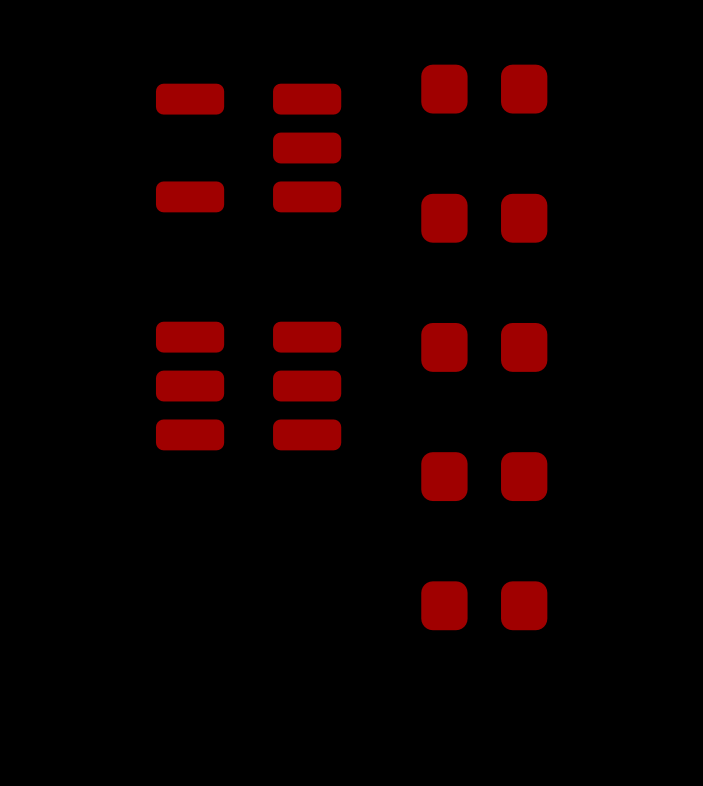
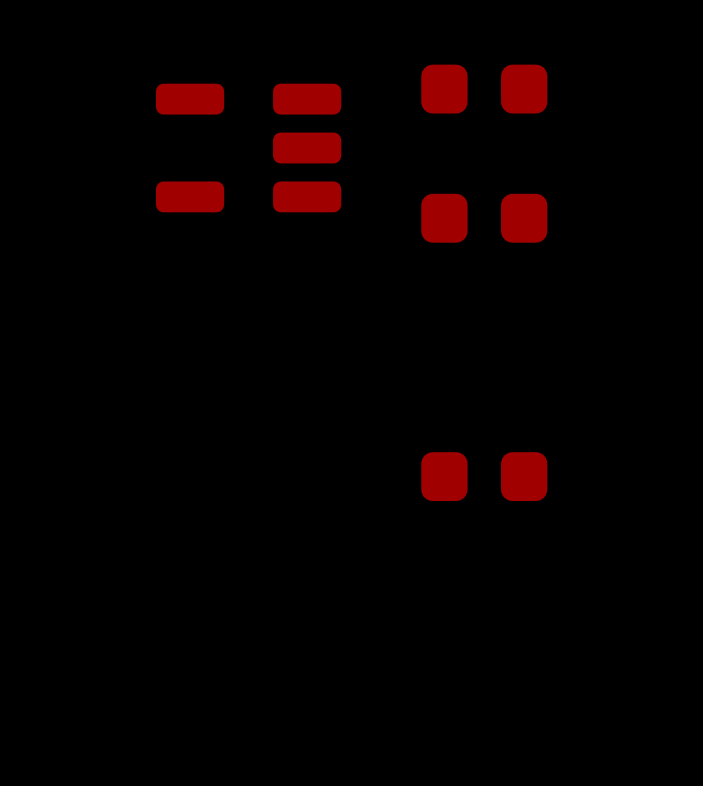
part: (484, 347) -> none
part: (248, 386) -> none
part: (484, 605) -> none

